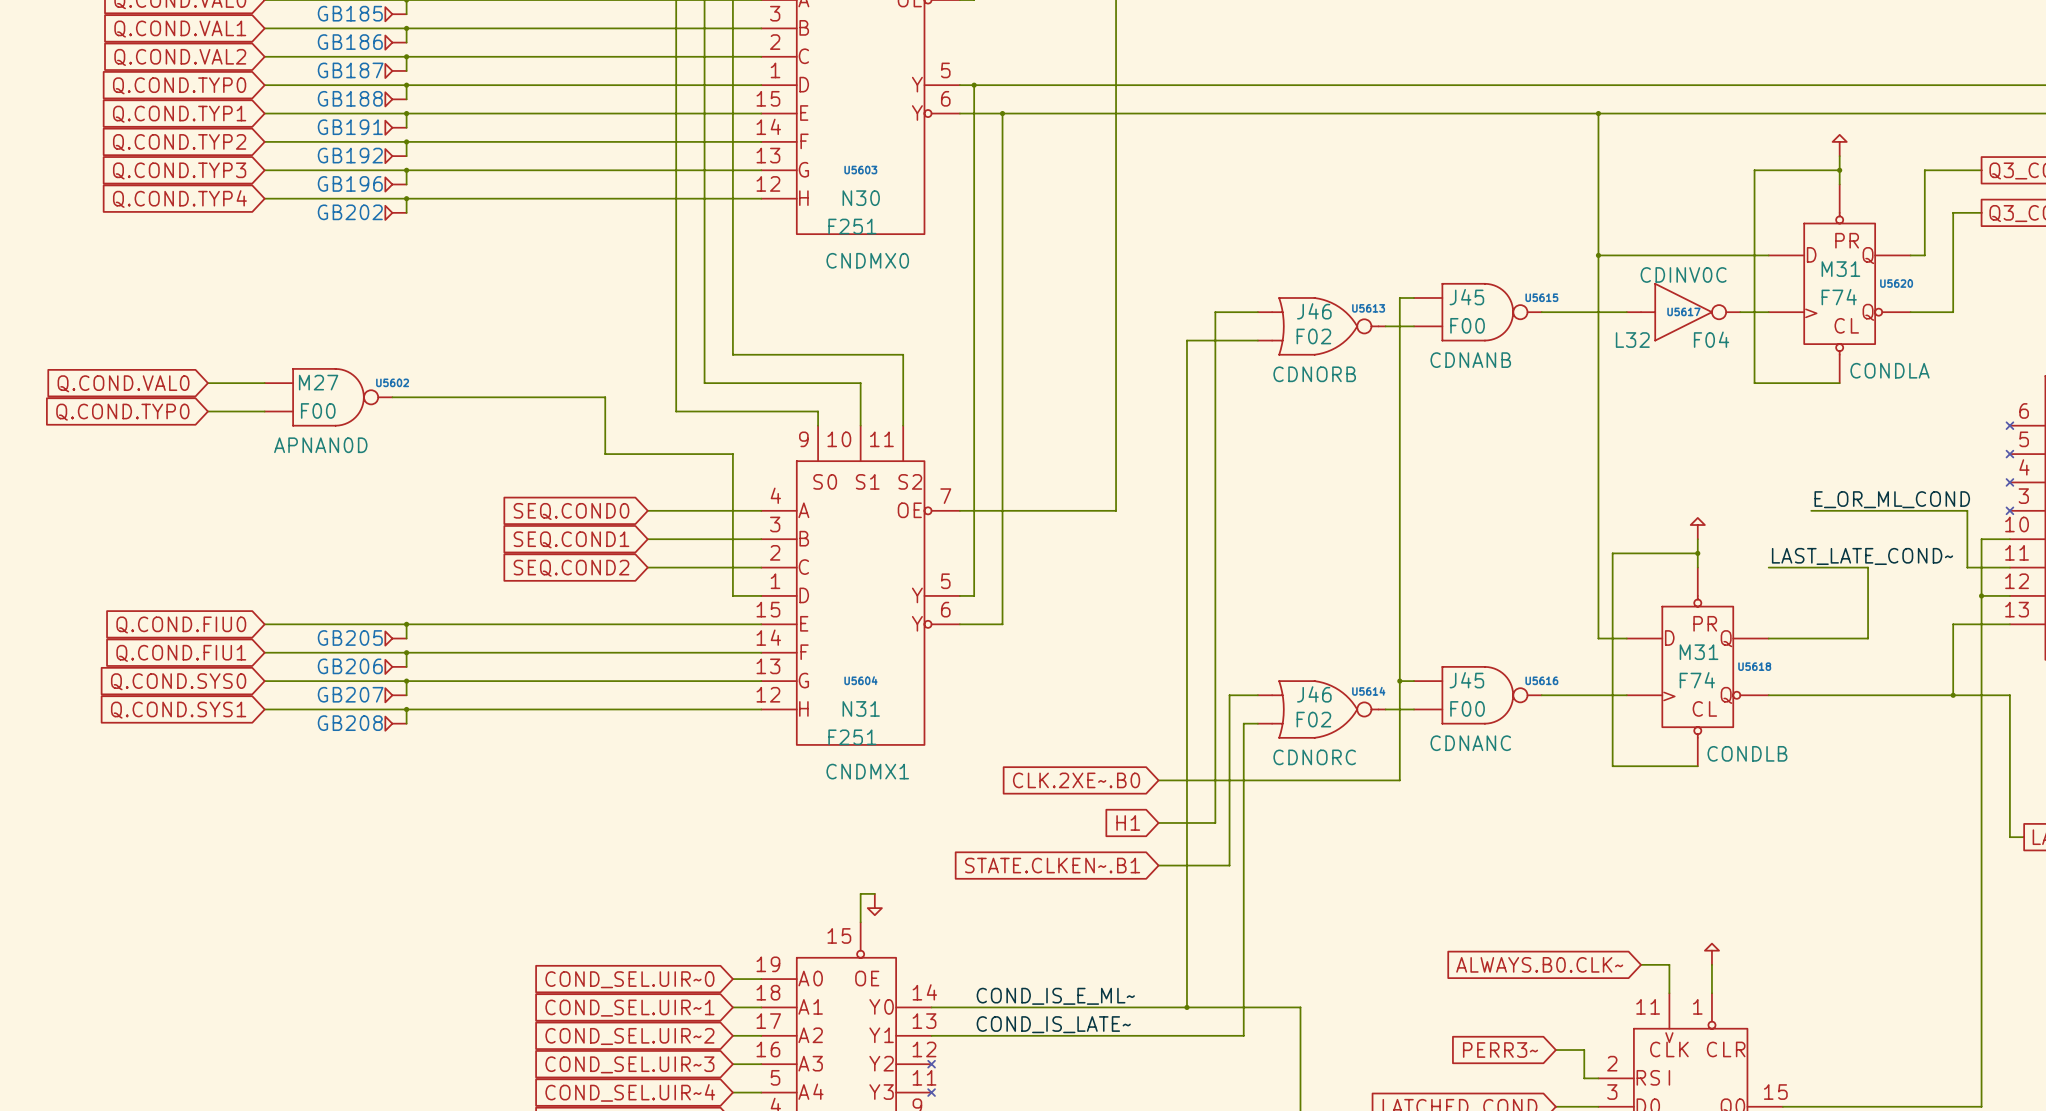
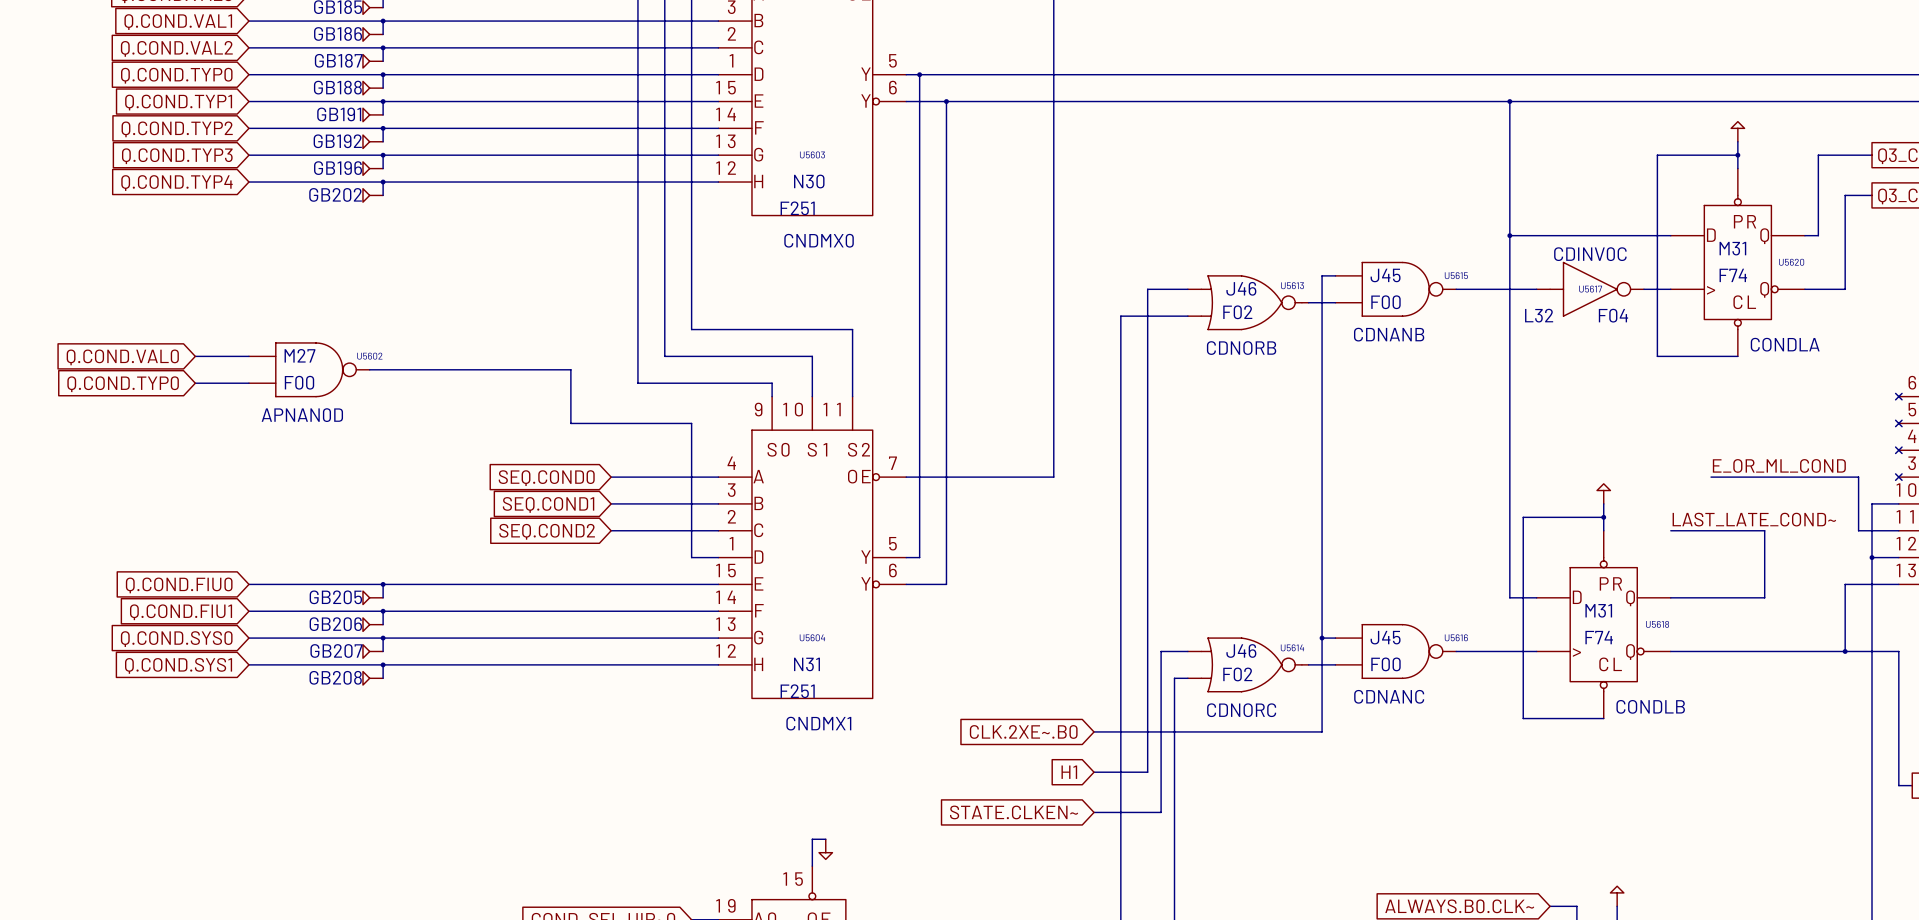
global label: STATE.CLKEN~.B1 (1052, 865) -> STATE.CLKEN~ (1014, 812)

